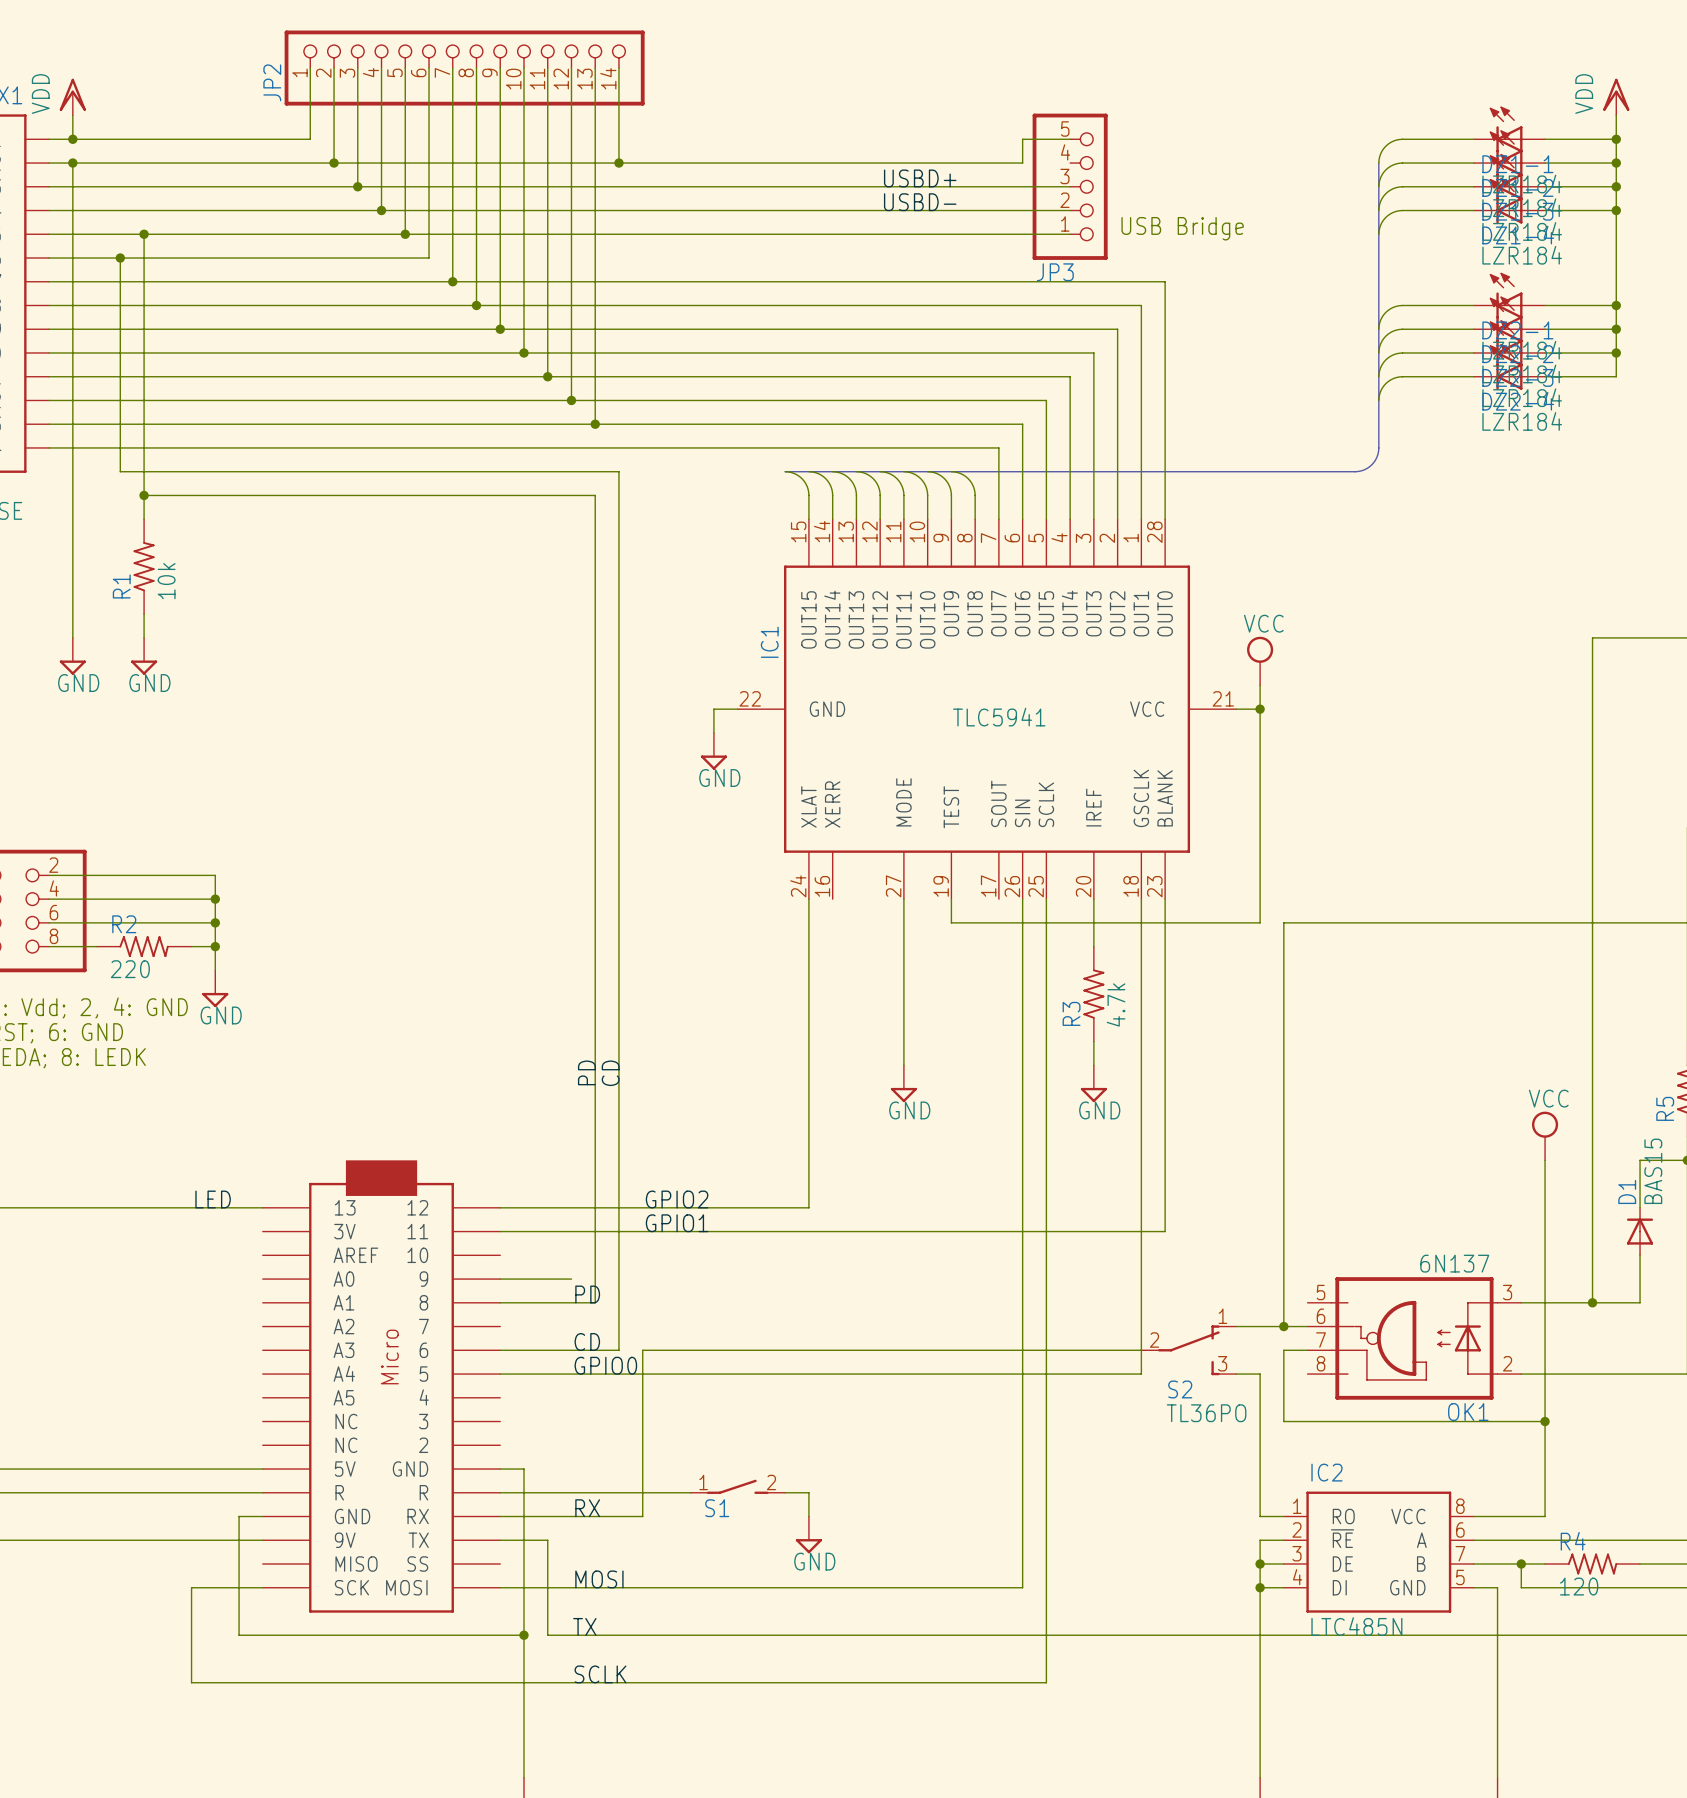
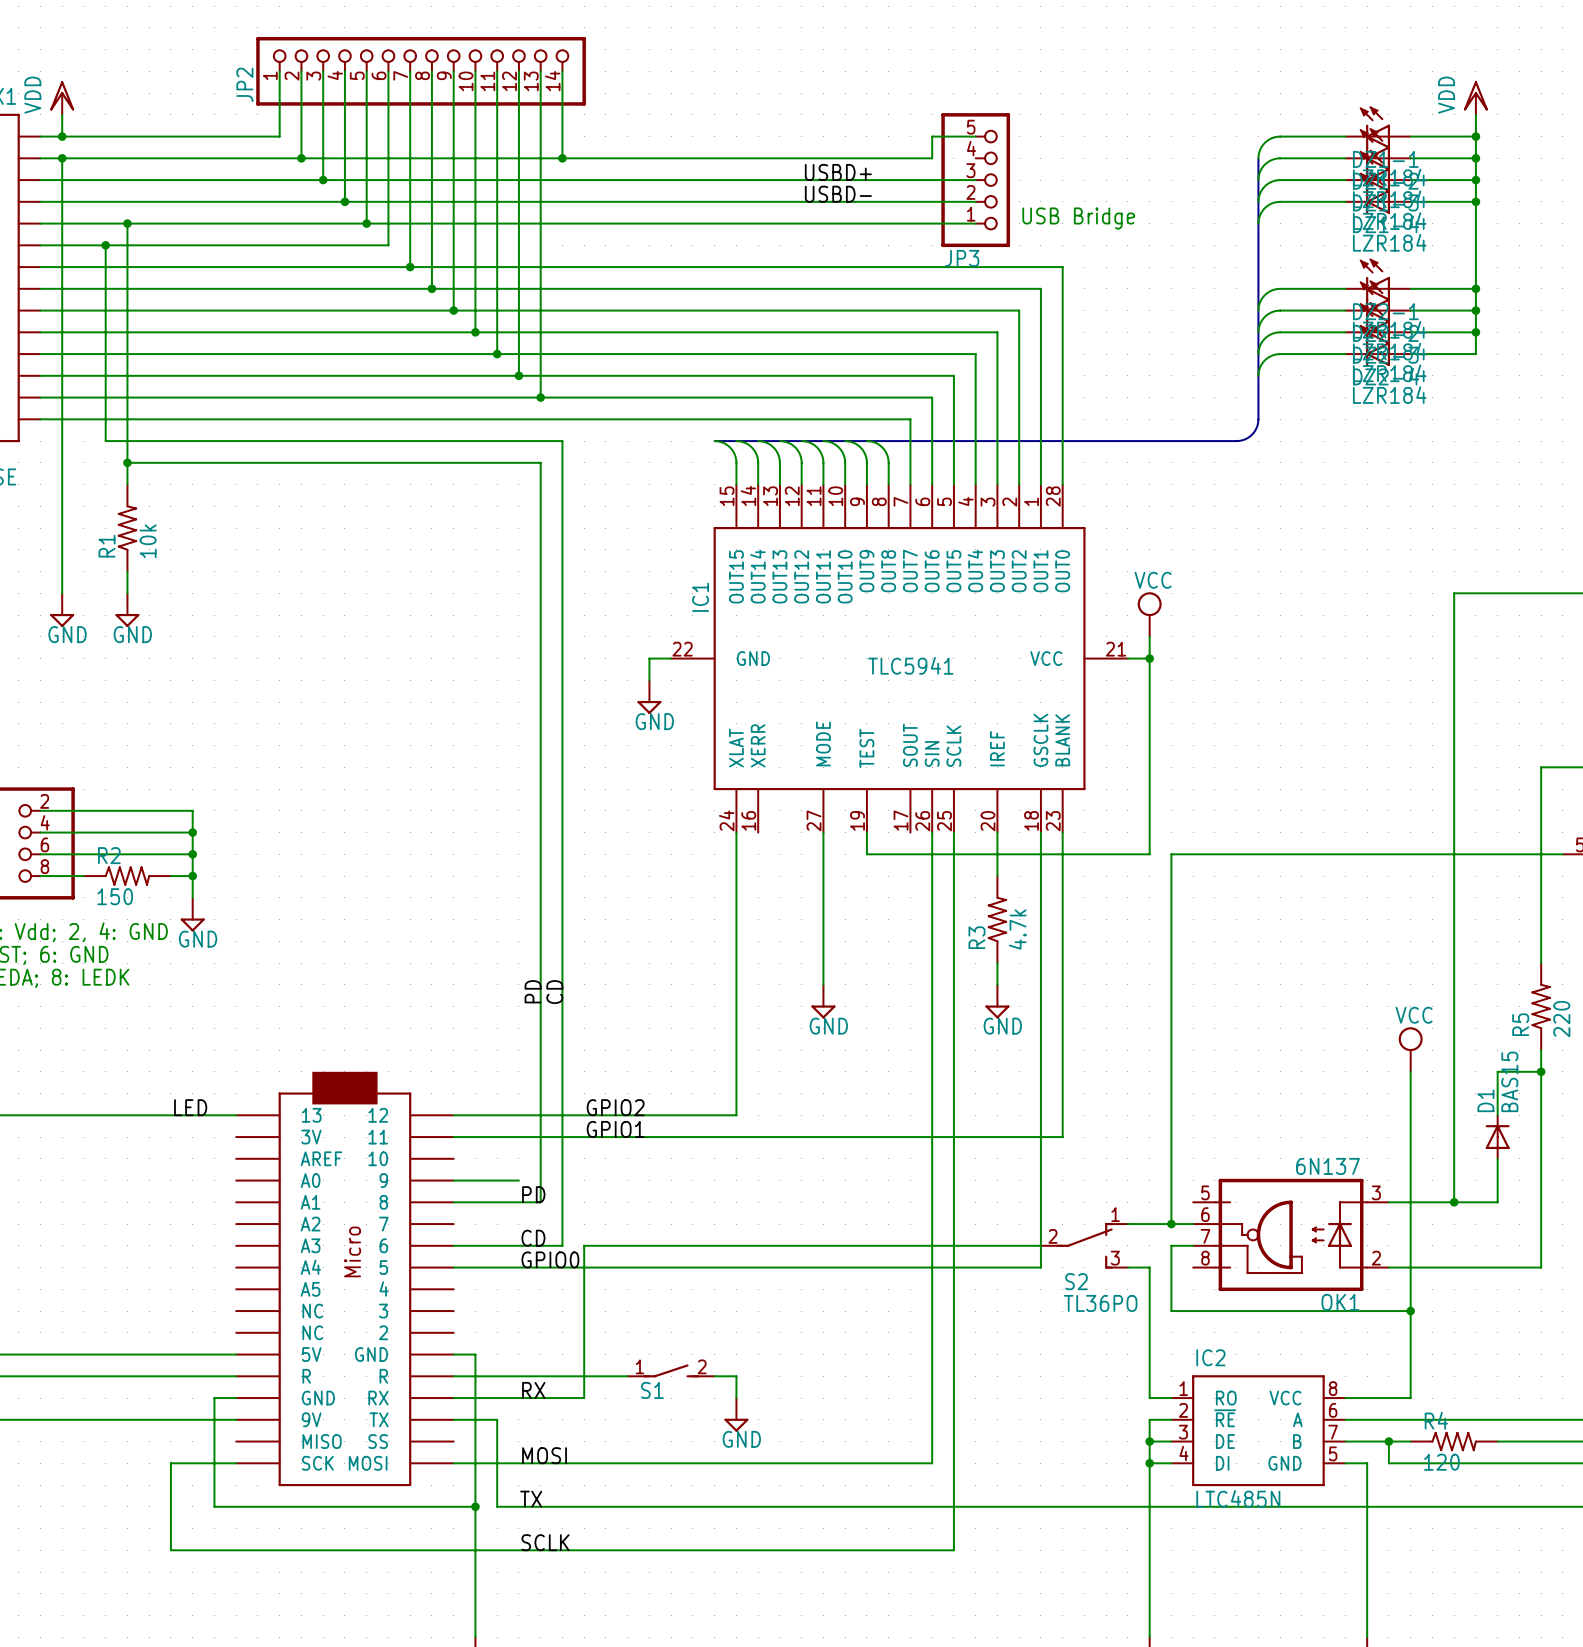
R2 value: 220 (130, 969) -> 150 (115, 896)

